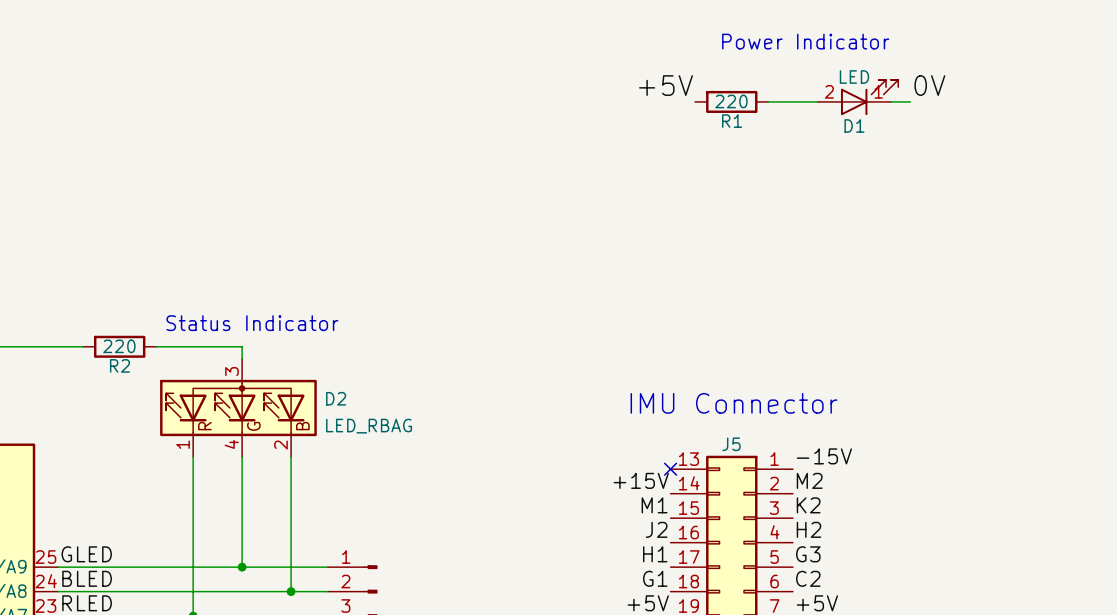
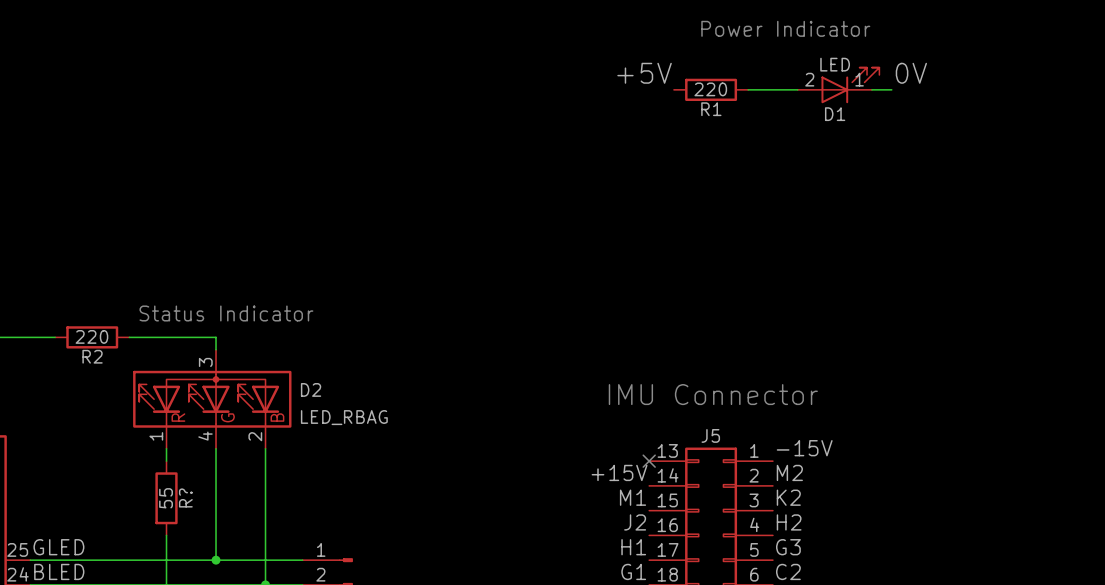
wire: (193, 469) (193, 542) -> none
R?: none -> 55 (166, 498)

